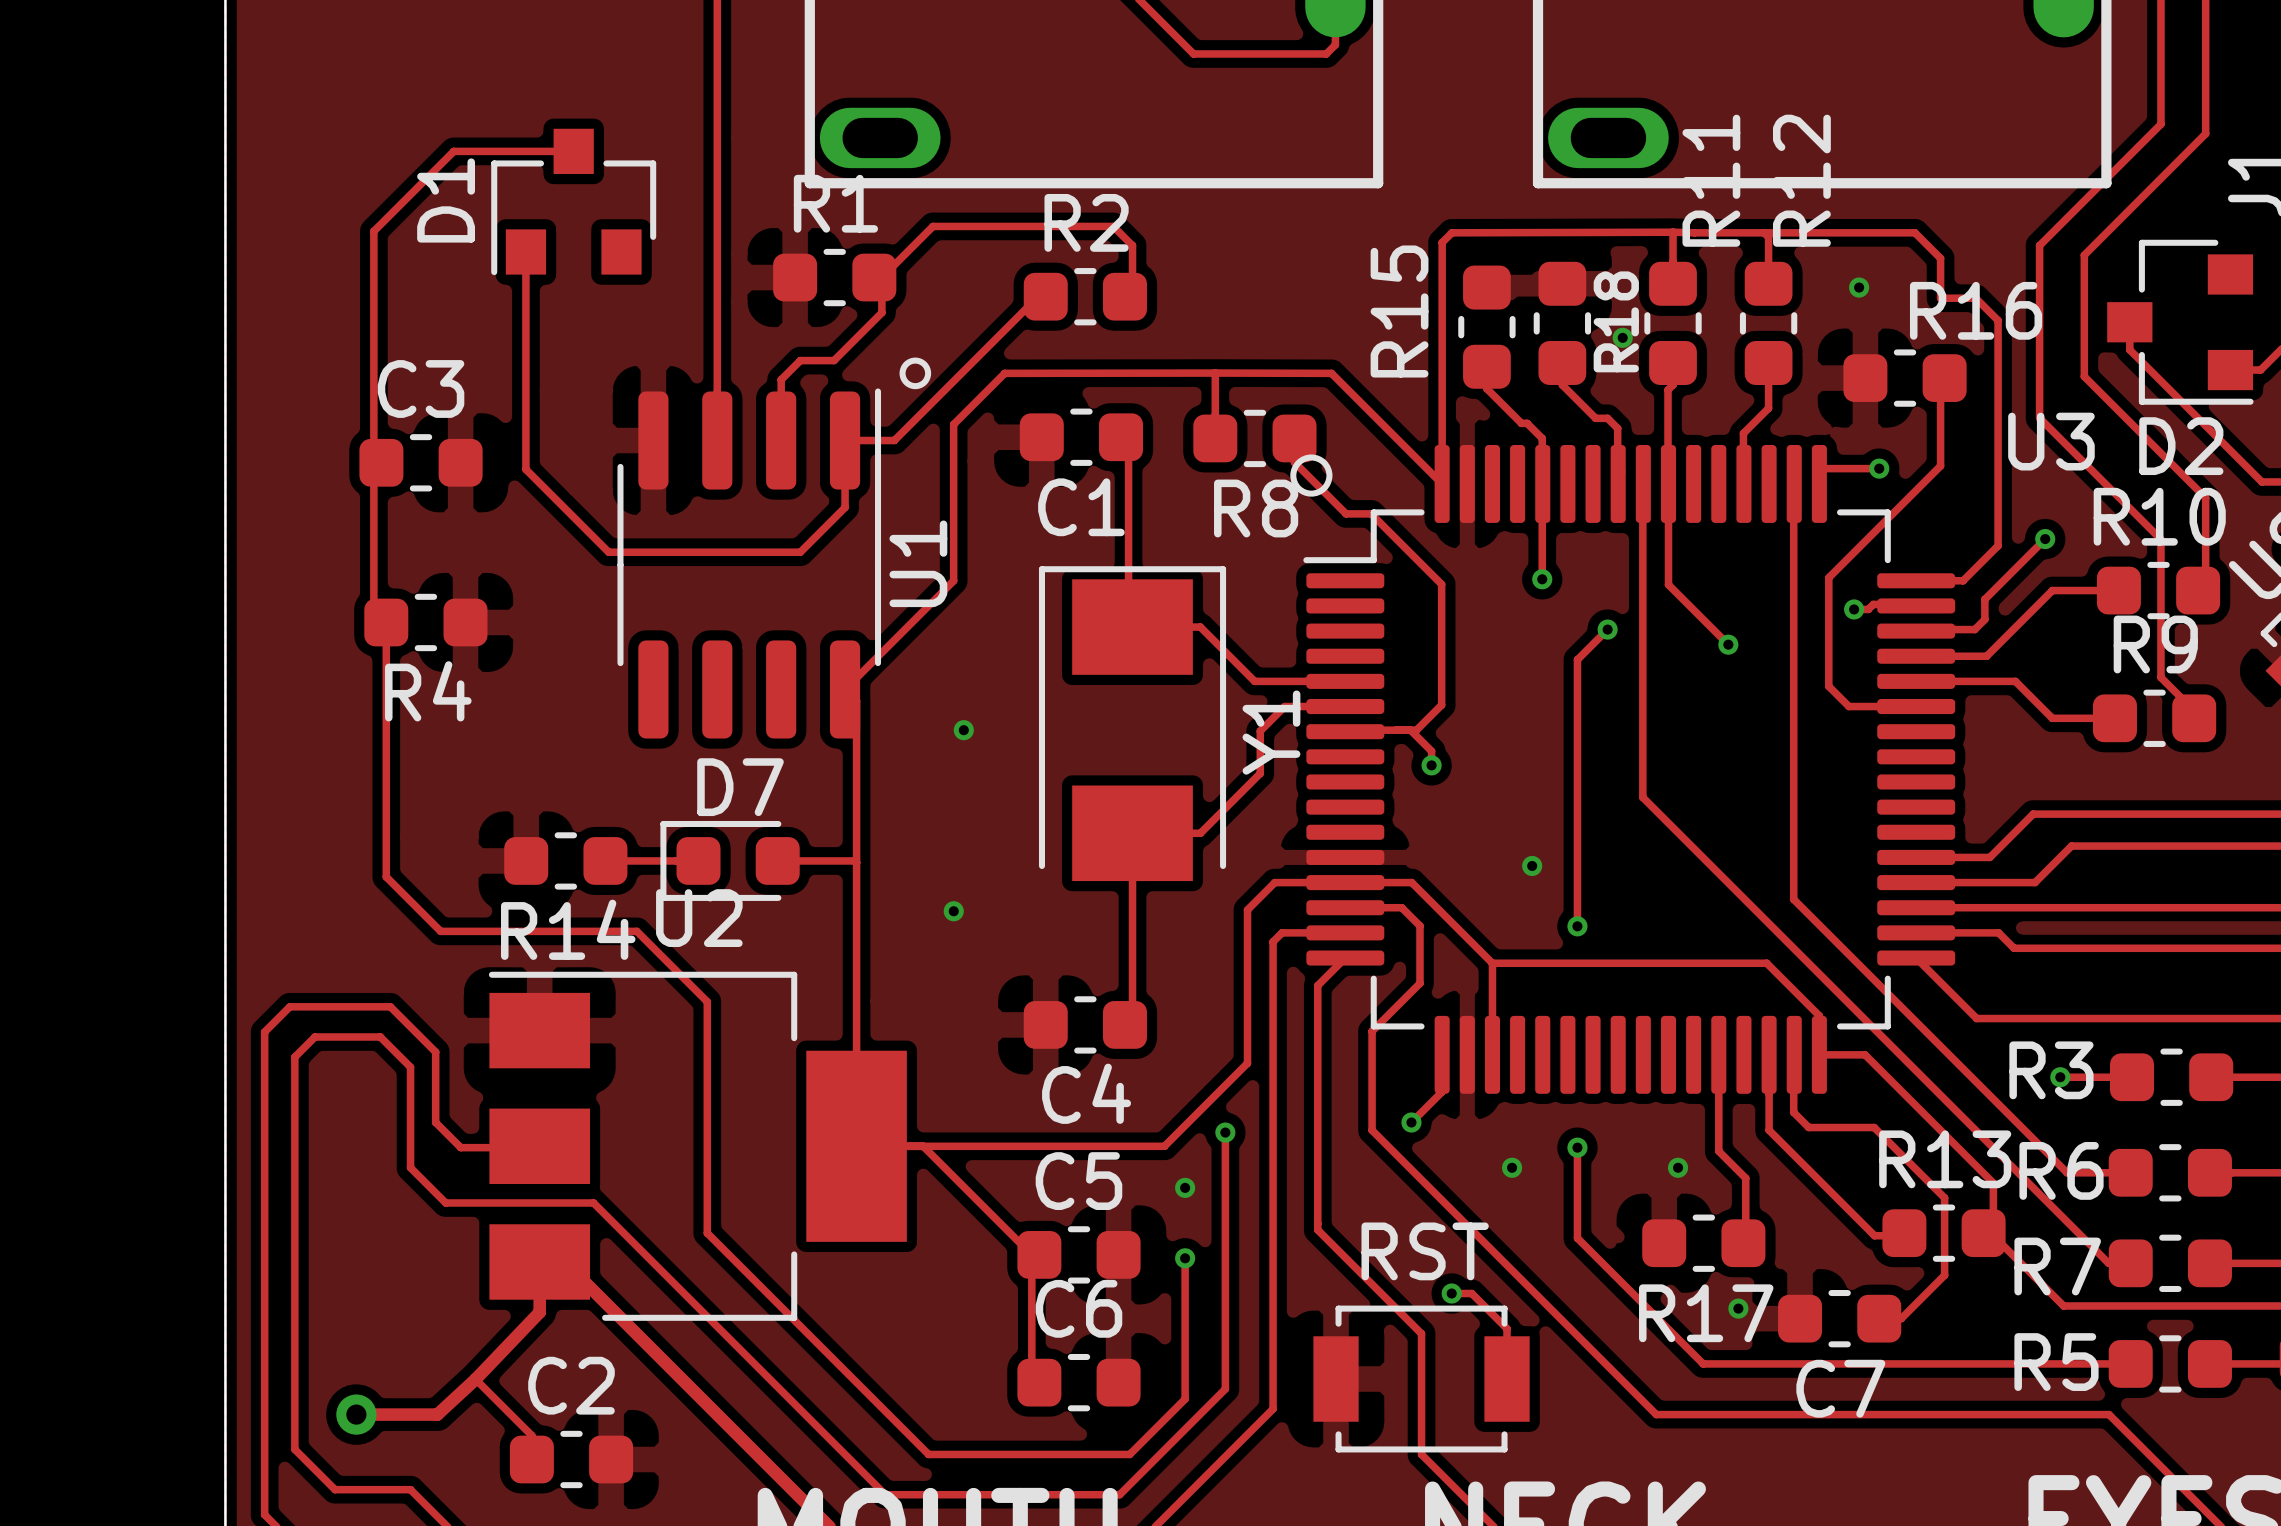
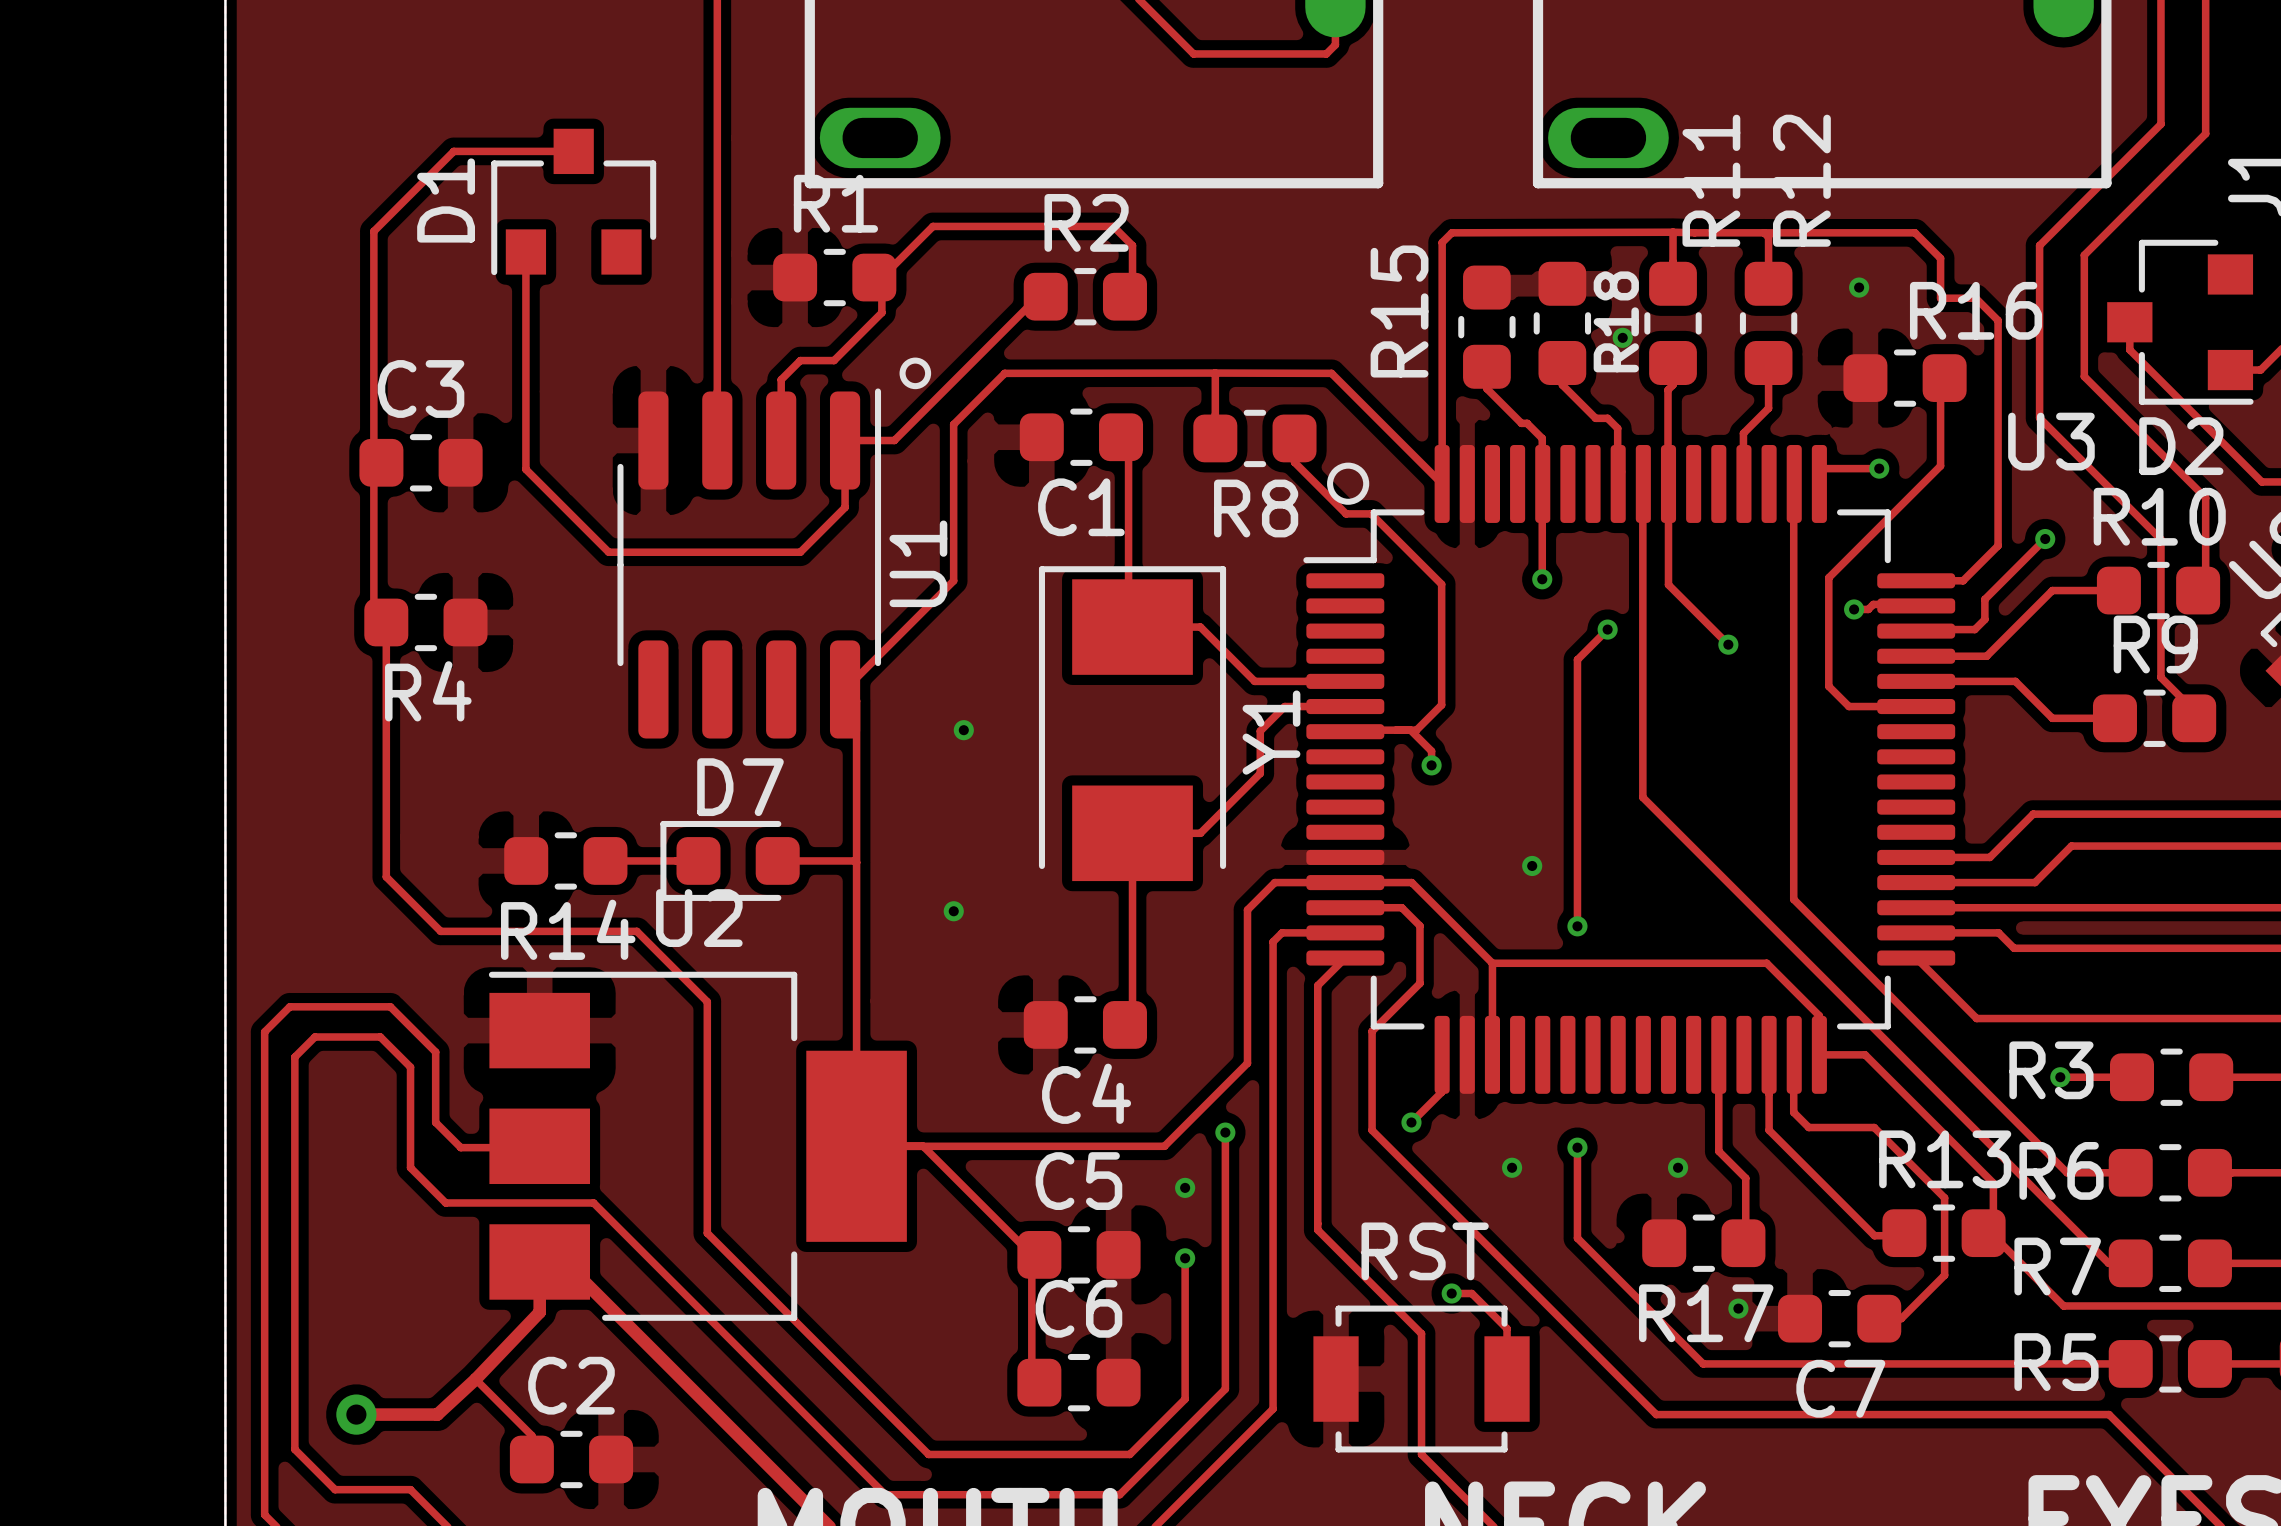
drawing position: (1311, 475) -> (1348, 483)

